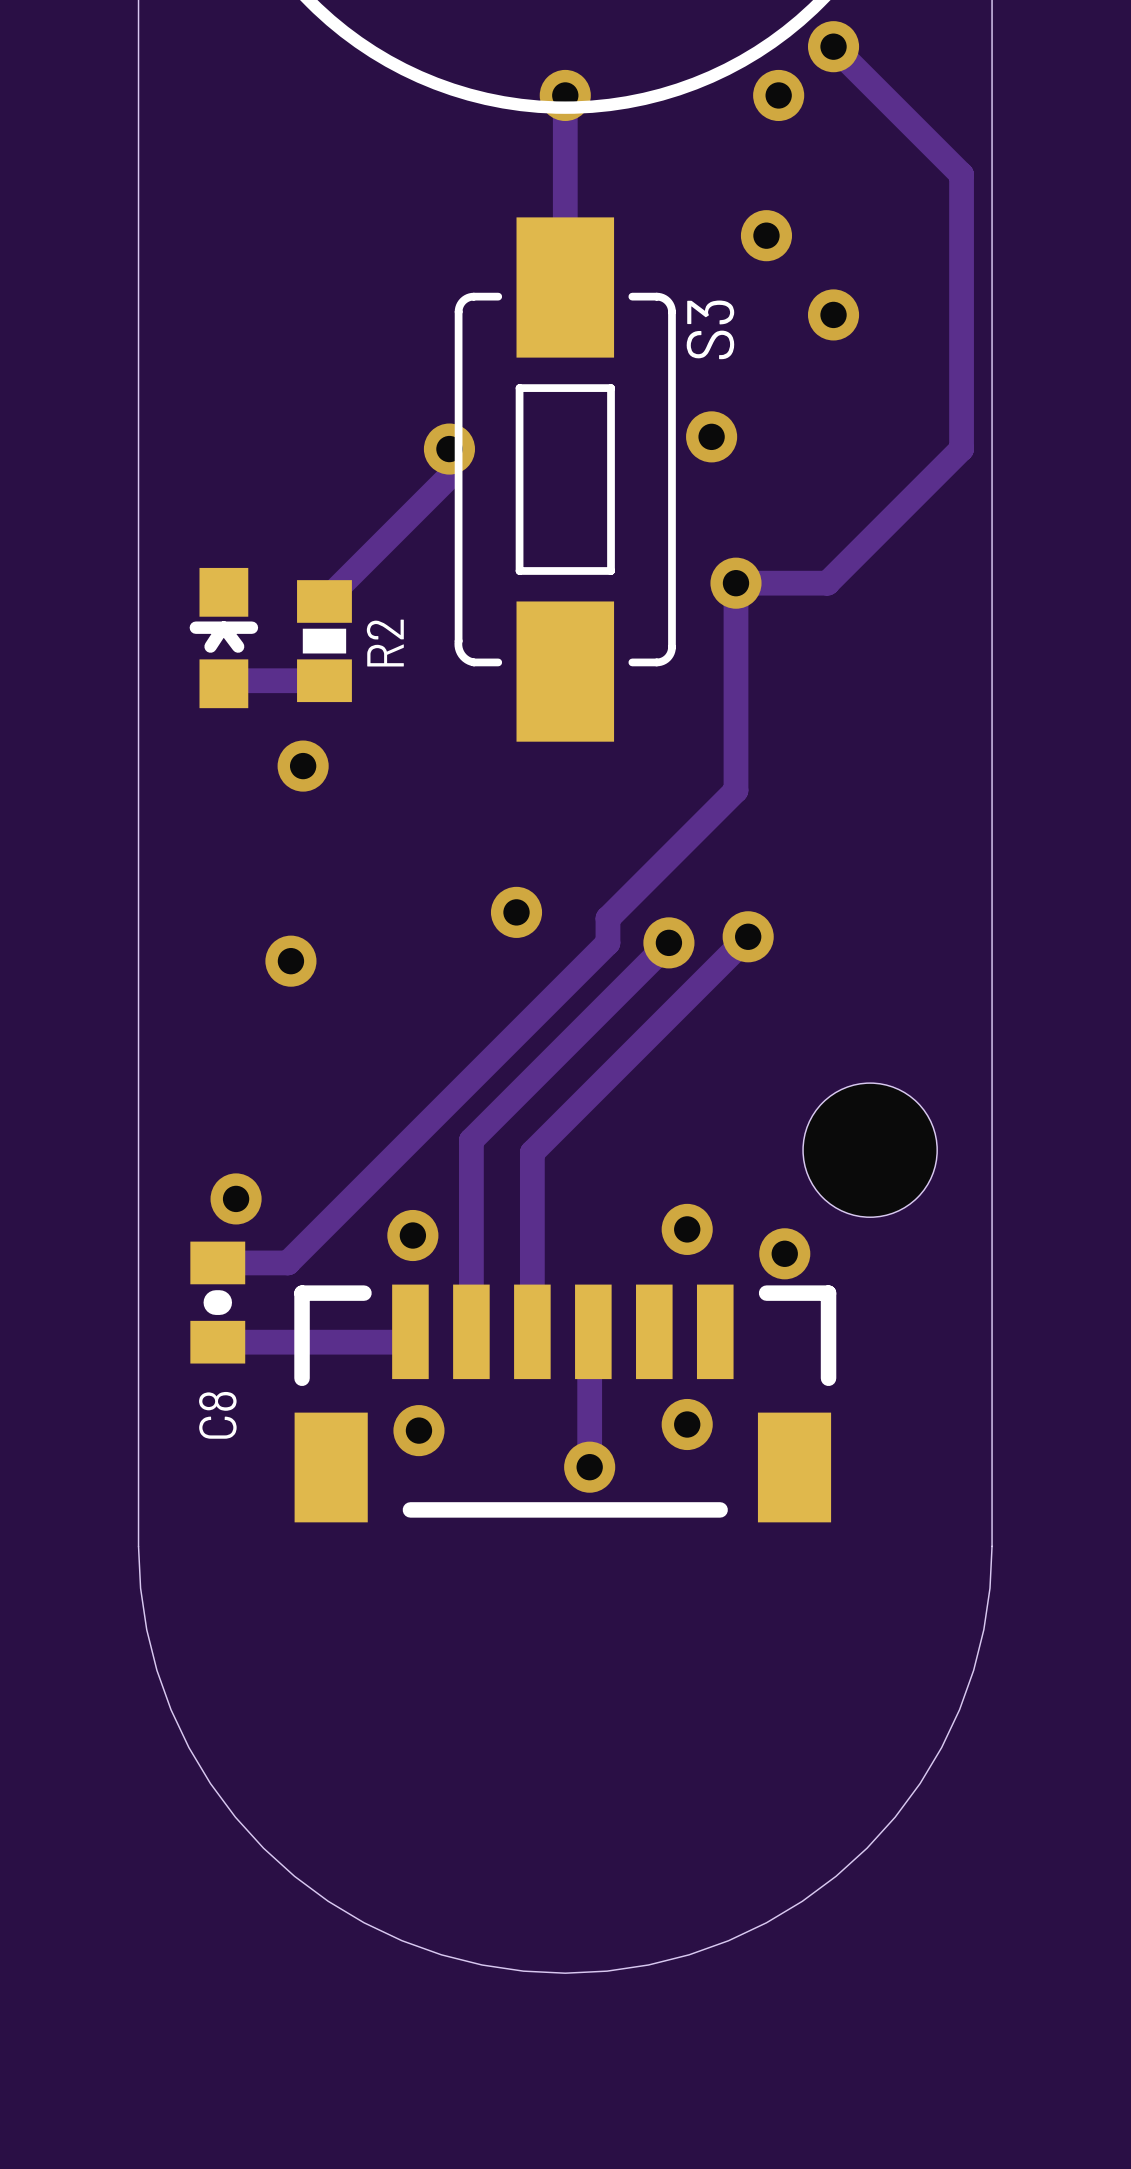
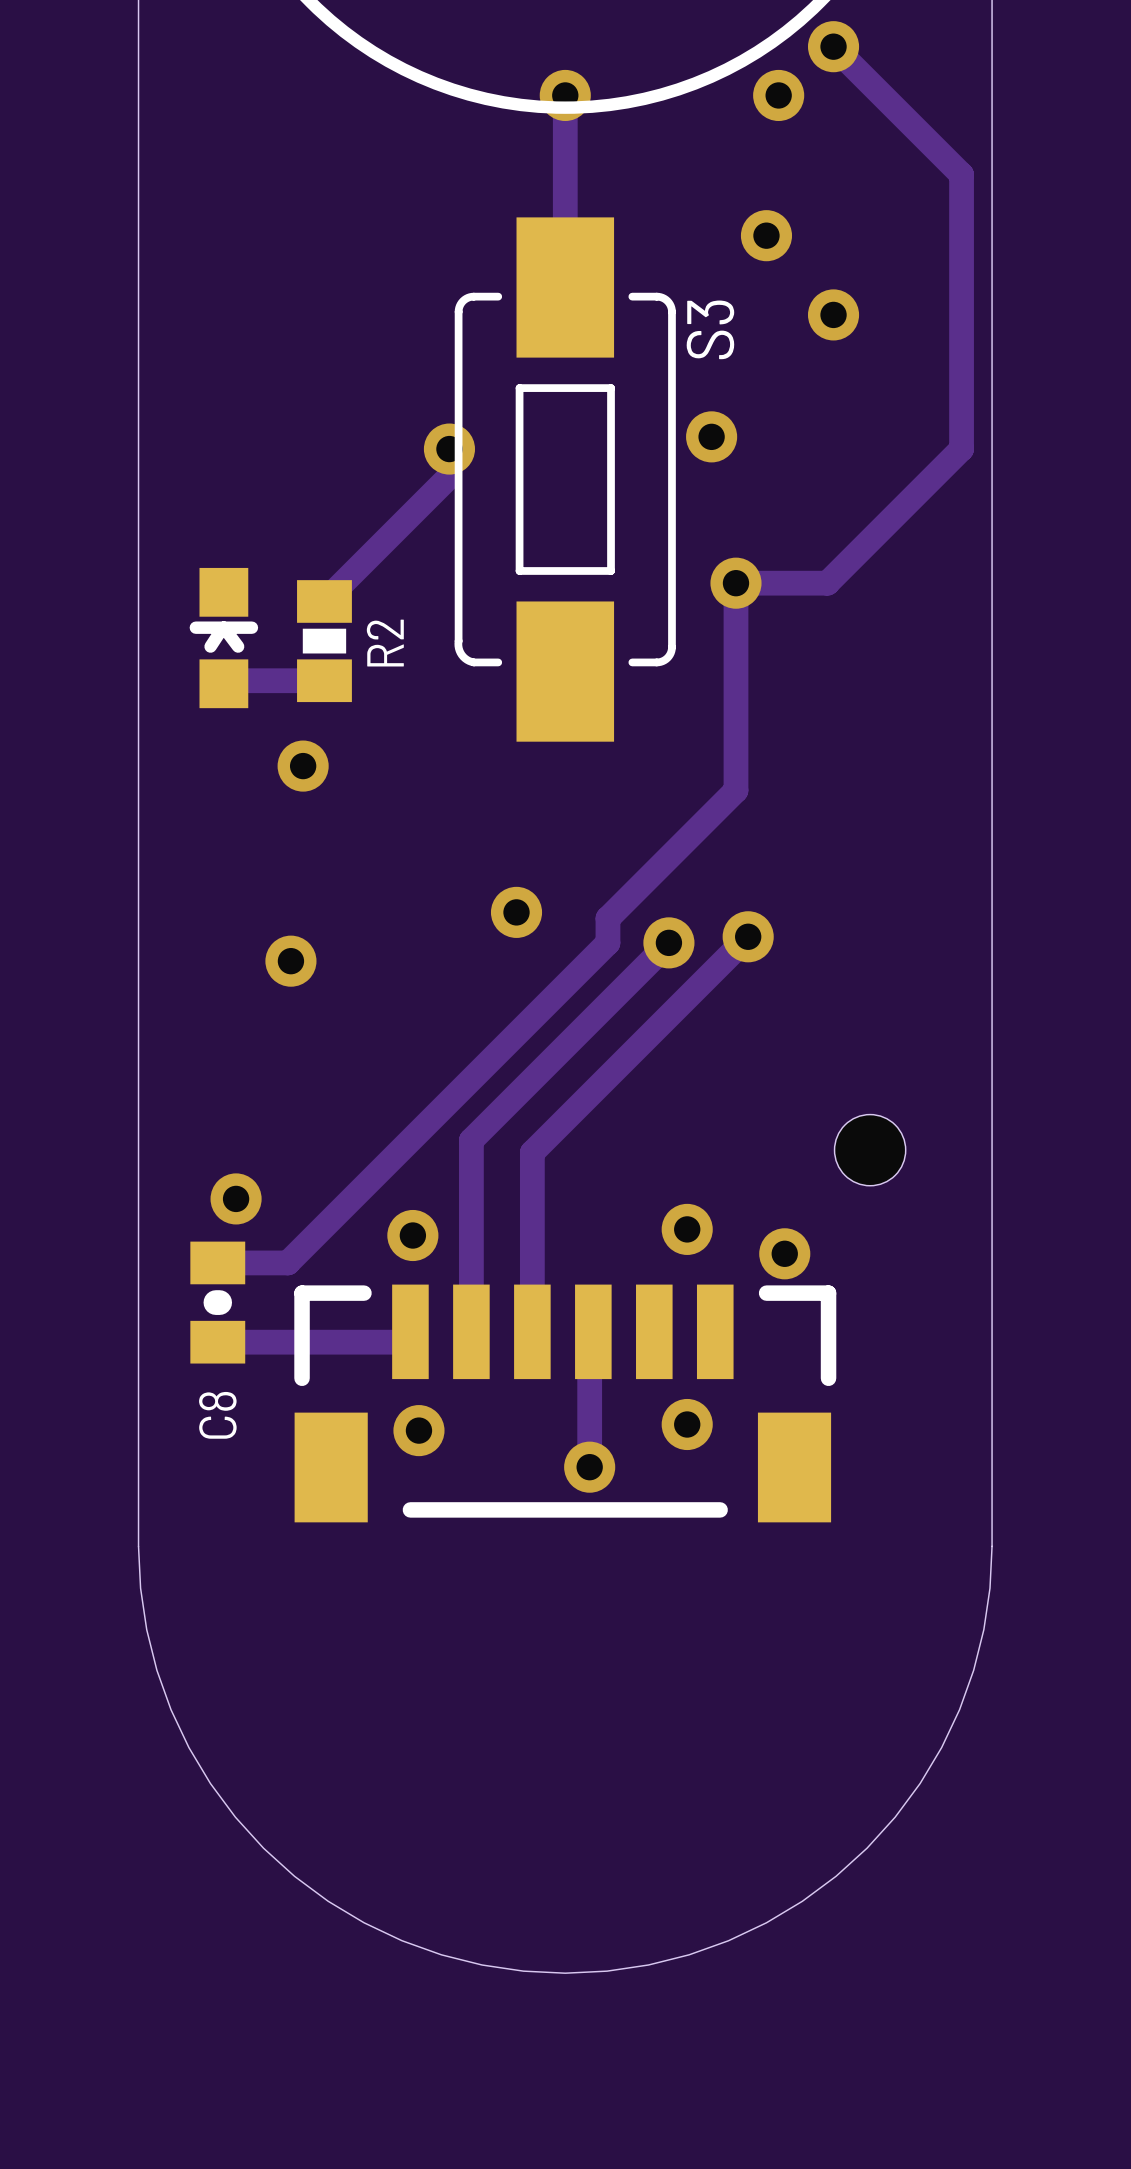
hole size: [803, 1083, 938, 1218] -> [834, 1114, 906, 1186]

